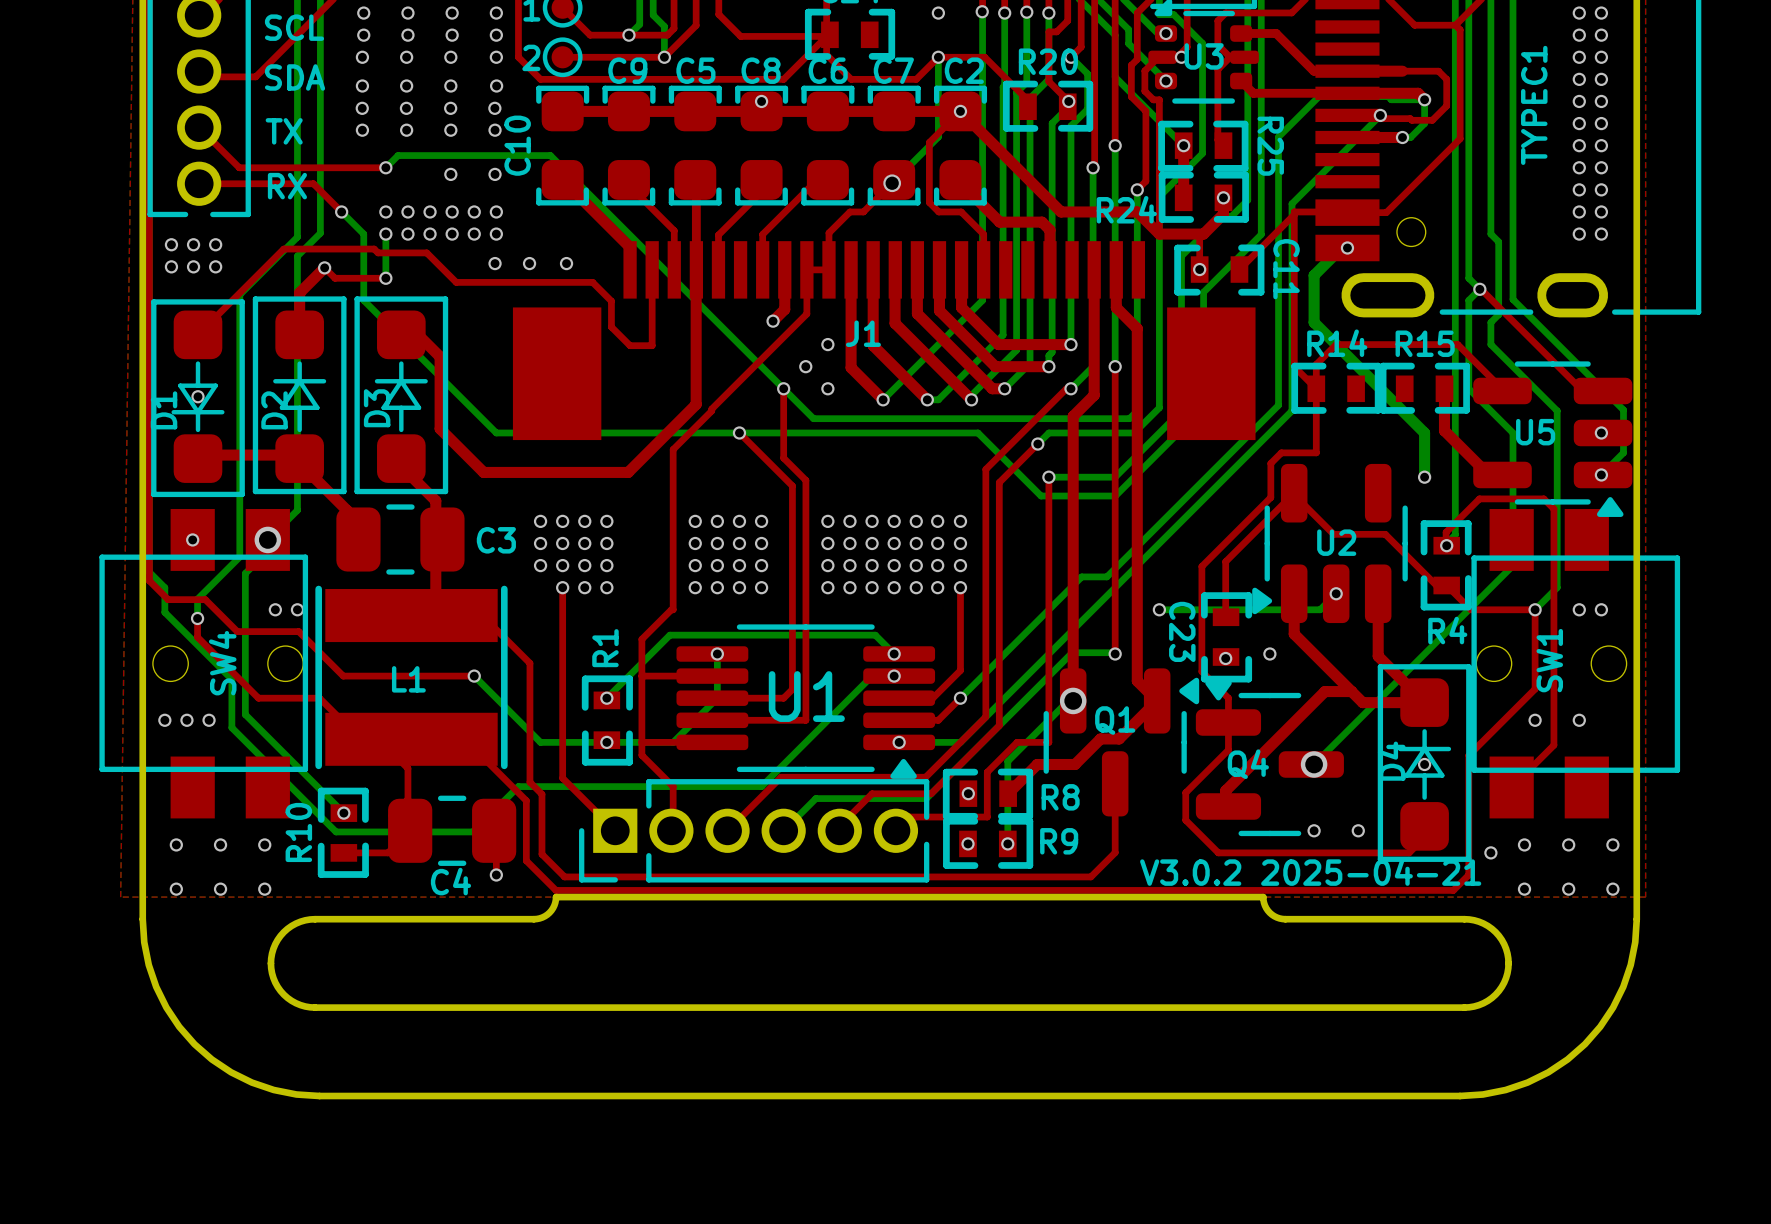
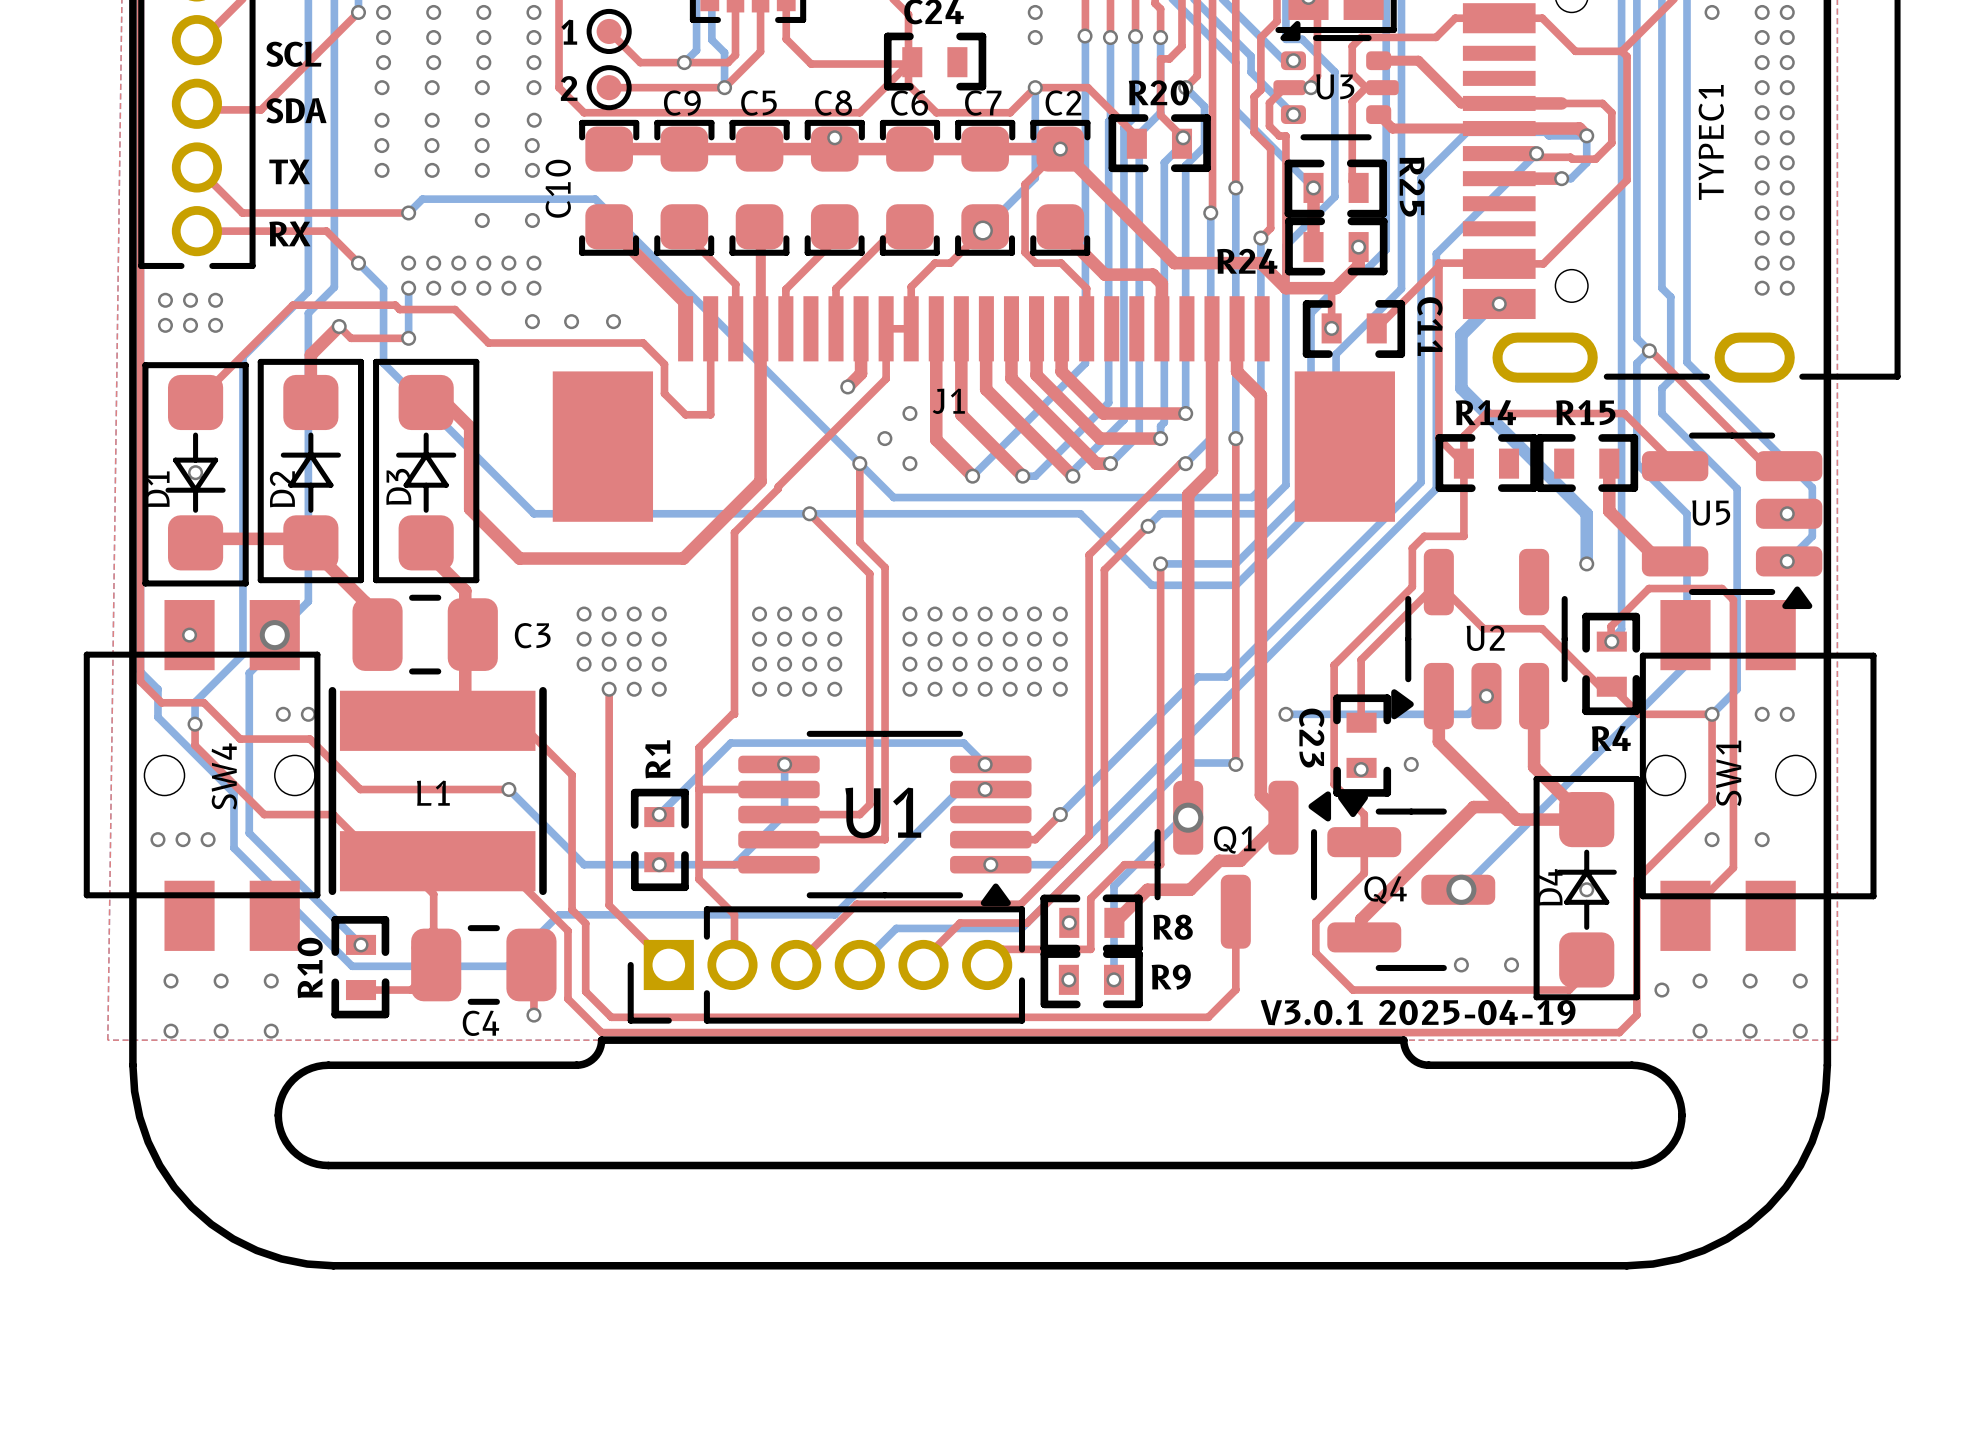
top track: (960, 587) (960, 670) (932, 698) (899, 698) -> none
text: V3.0.2 2025-04-21 (1310, 872) -> V3.0.1 2025-04-19 (1418, 1012)

